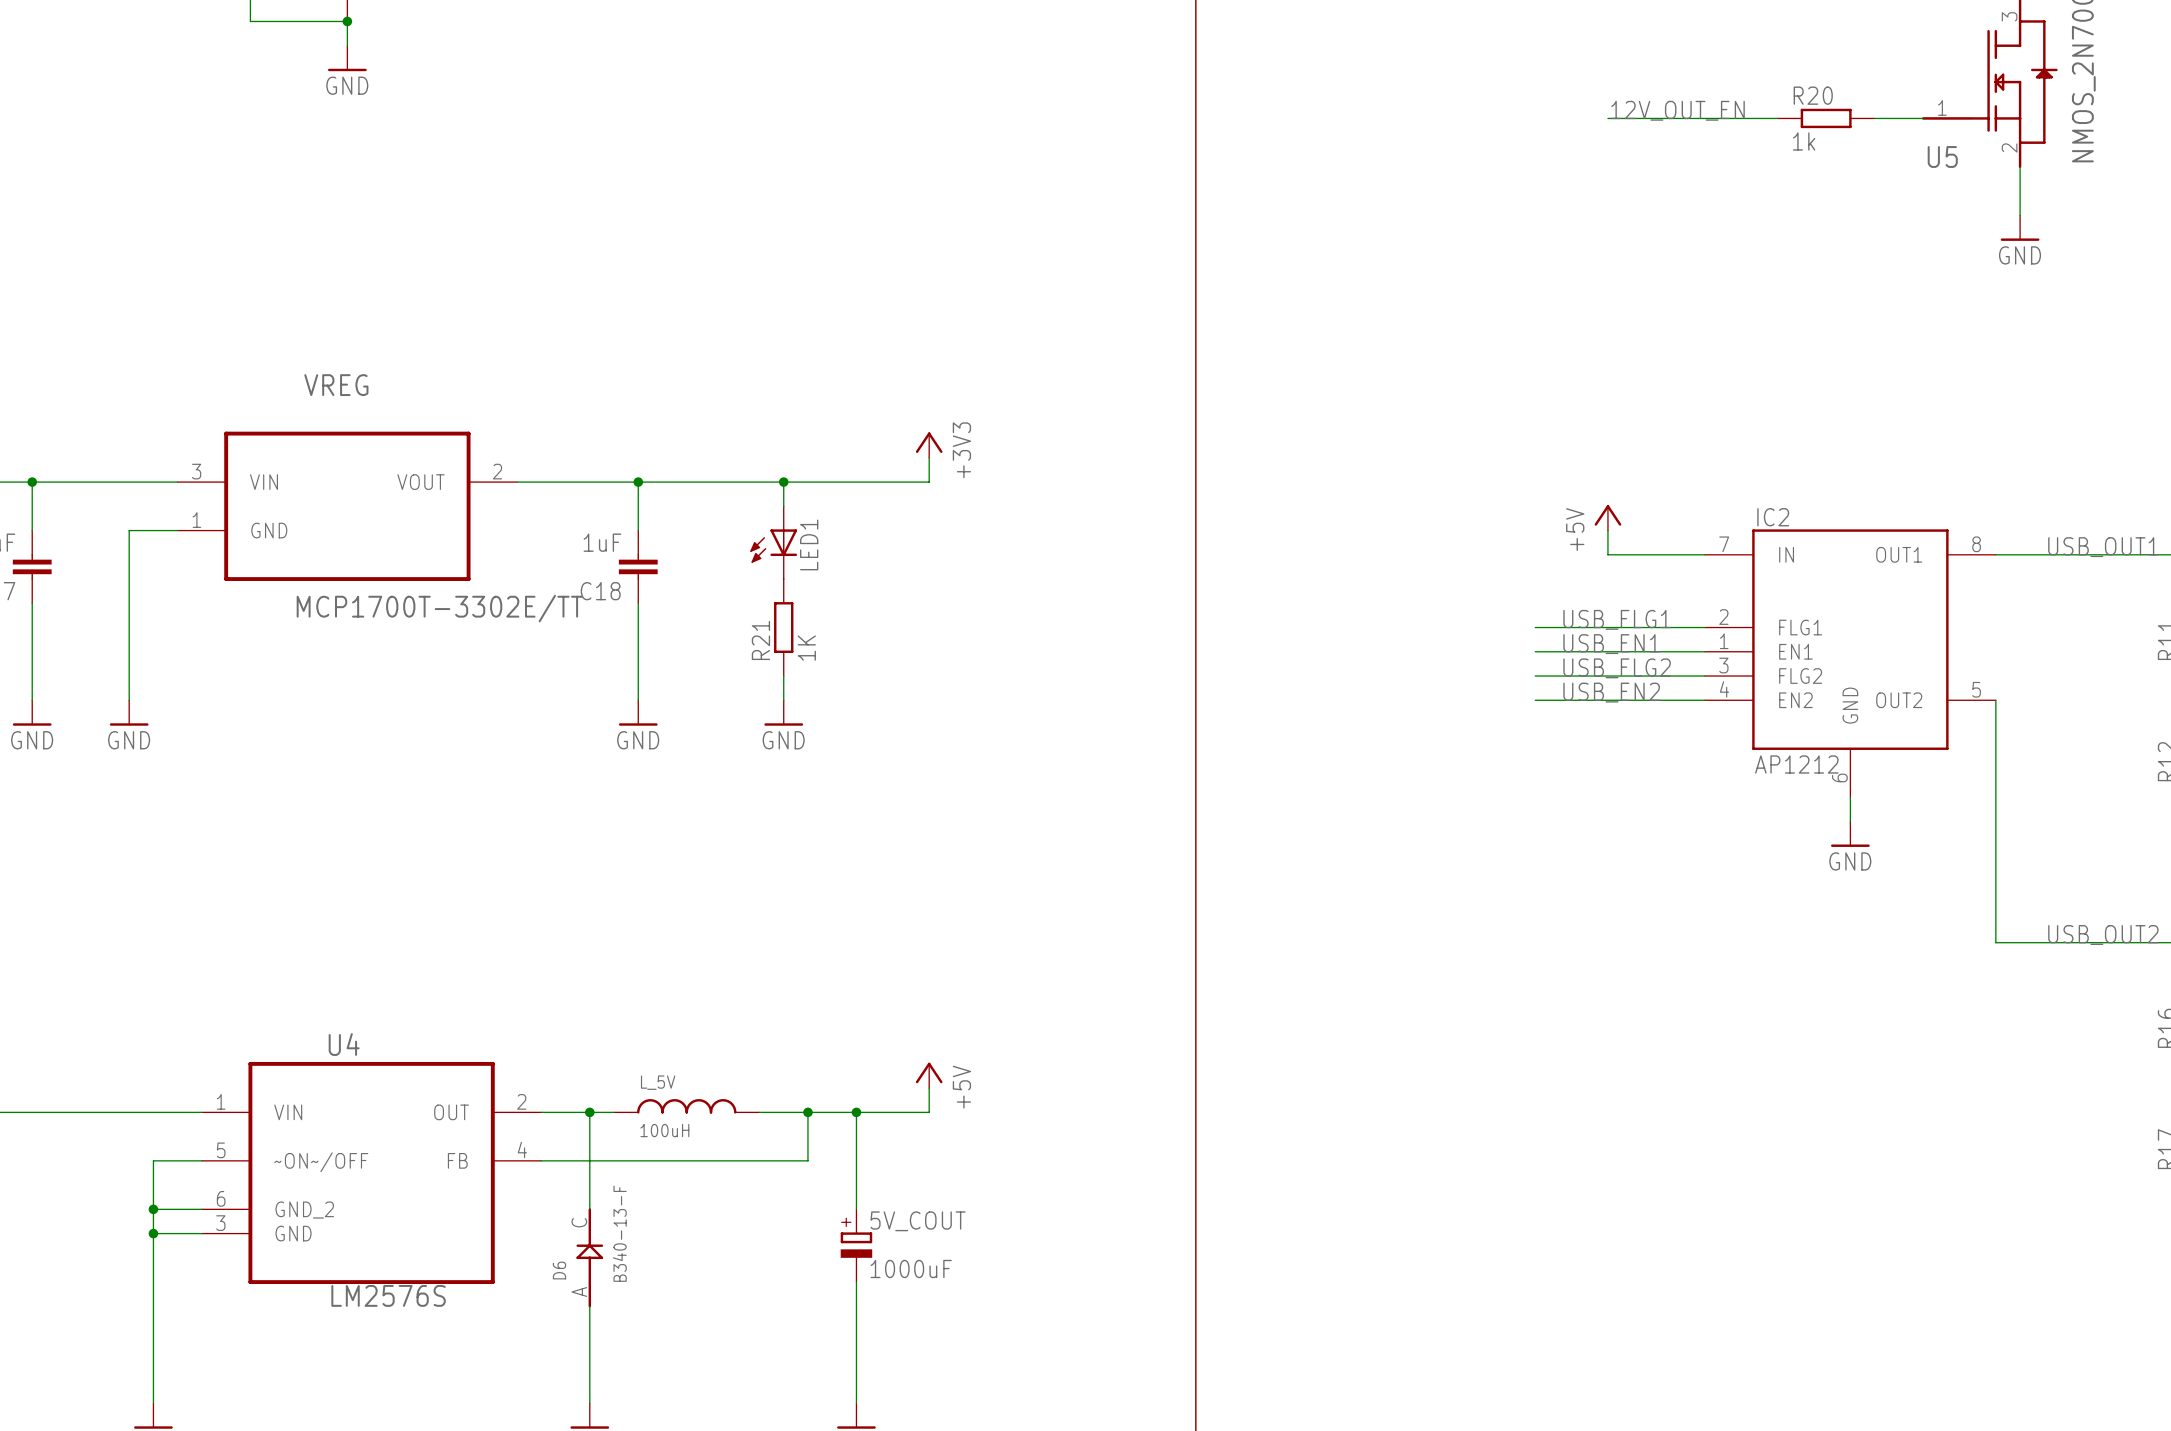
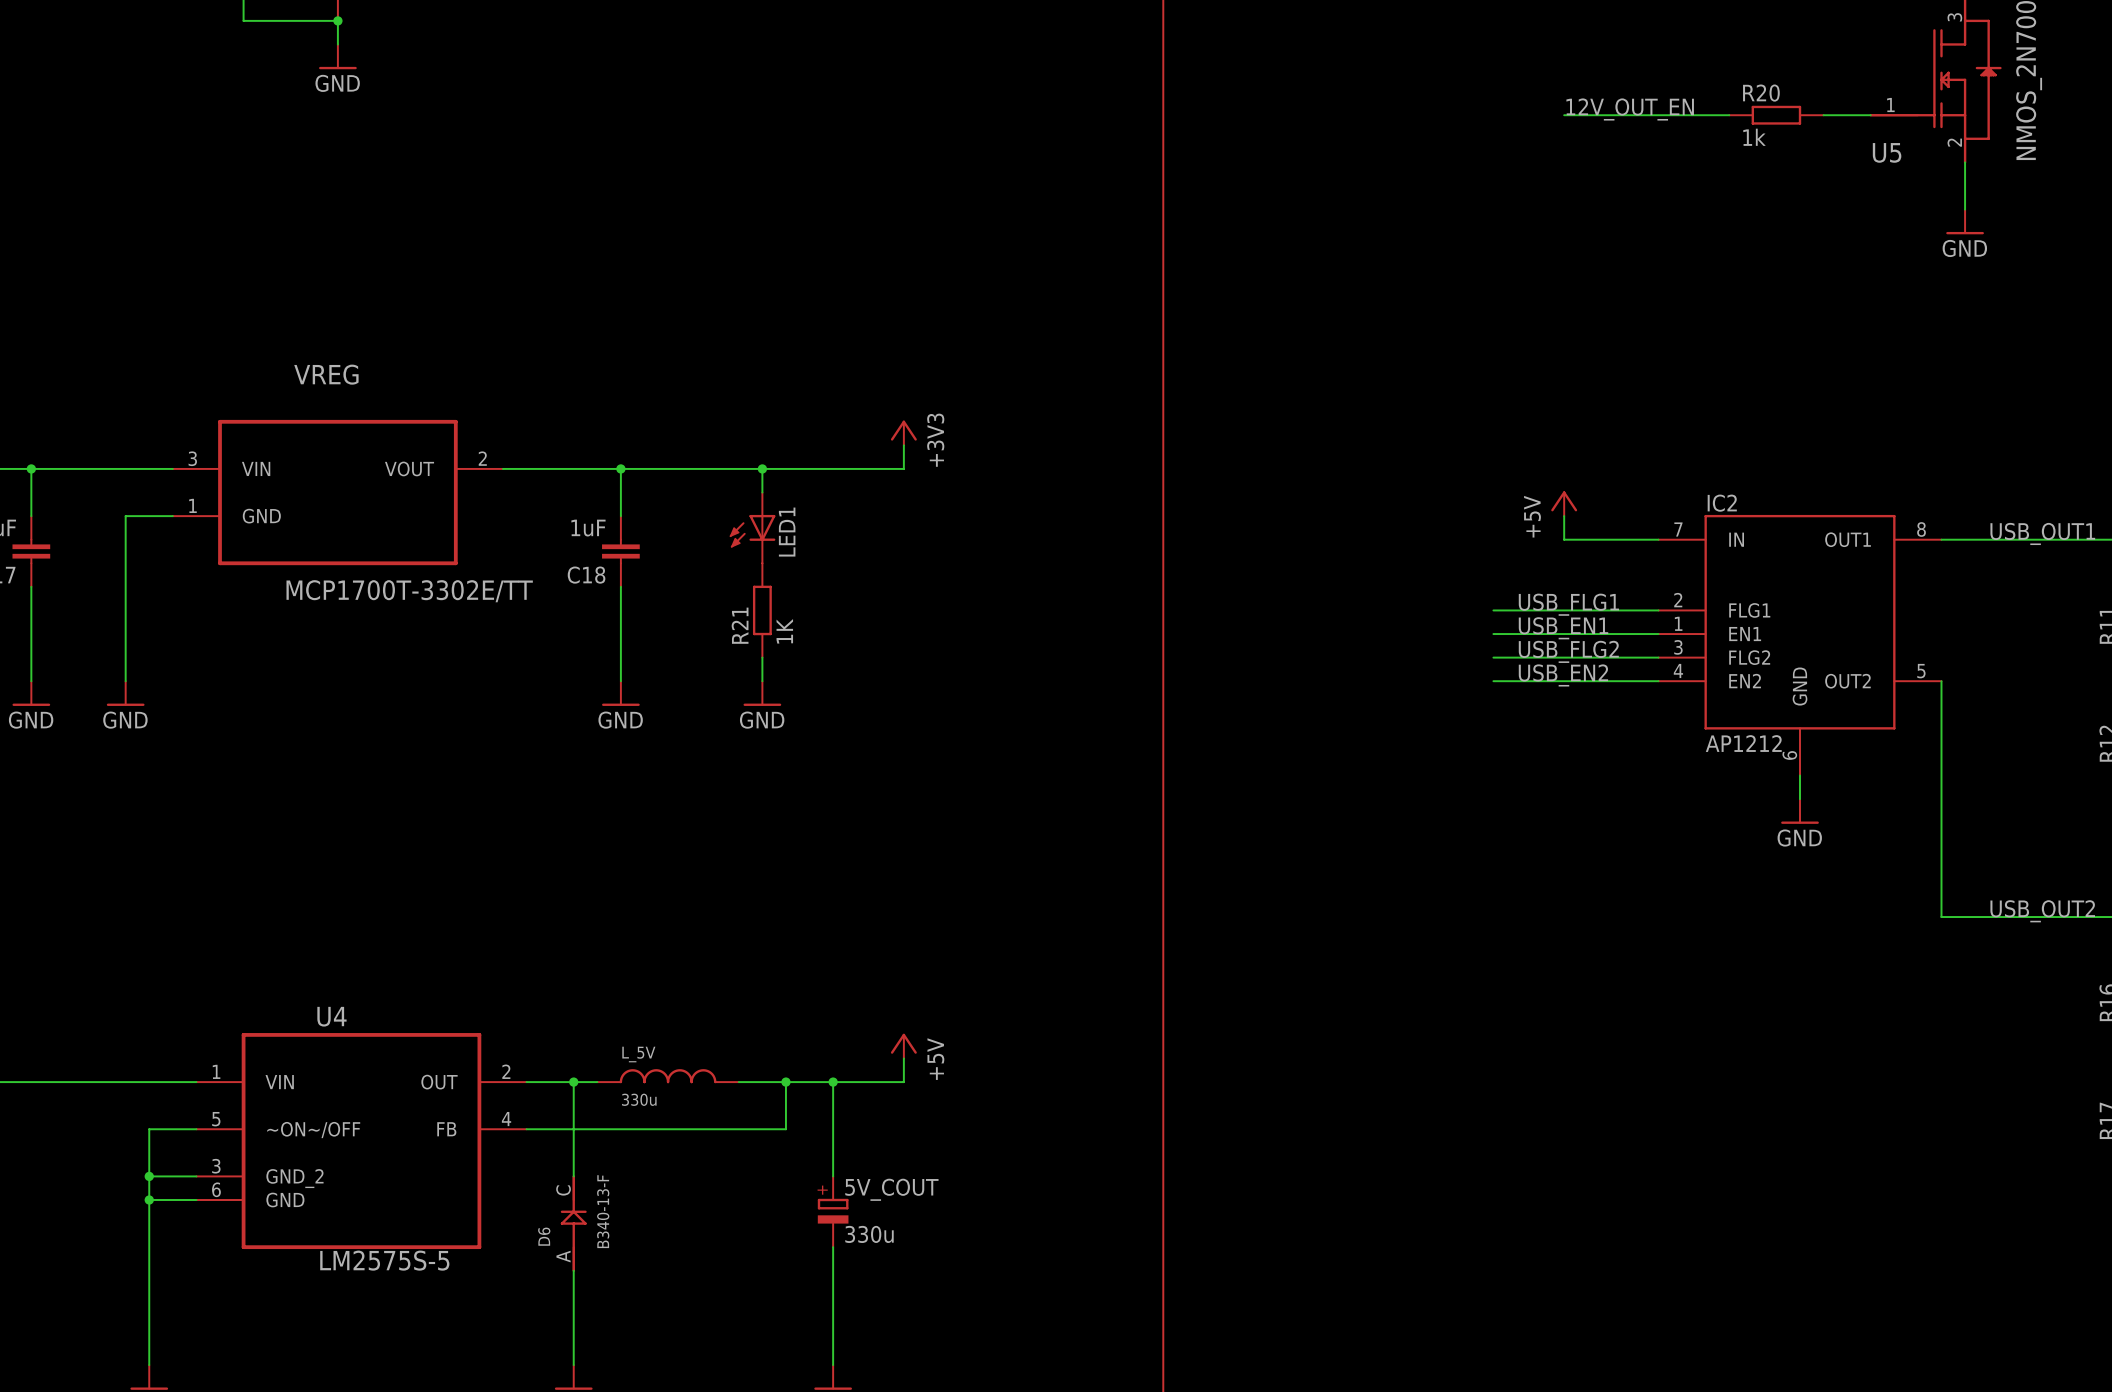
L_5V value: 100uH (664, 1130) -> 330u (639, 1099)
U4 pin number: 6 (221, 1198) -> 3 (216, 1166)
U4 pin number: 3 (220, 1223) -> 6 (216, 1189)
5V_COUT value: 1000uF (911, 1268) -> 330u (869, 1234)
U4 value: LM2576S (388, 1295) -> LM2575S-5 (384, 1260)

